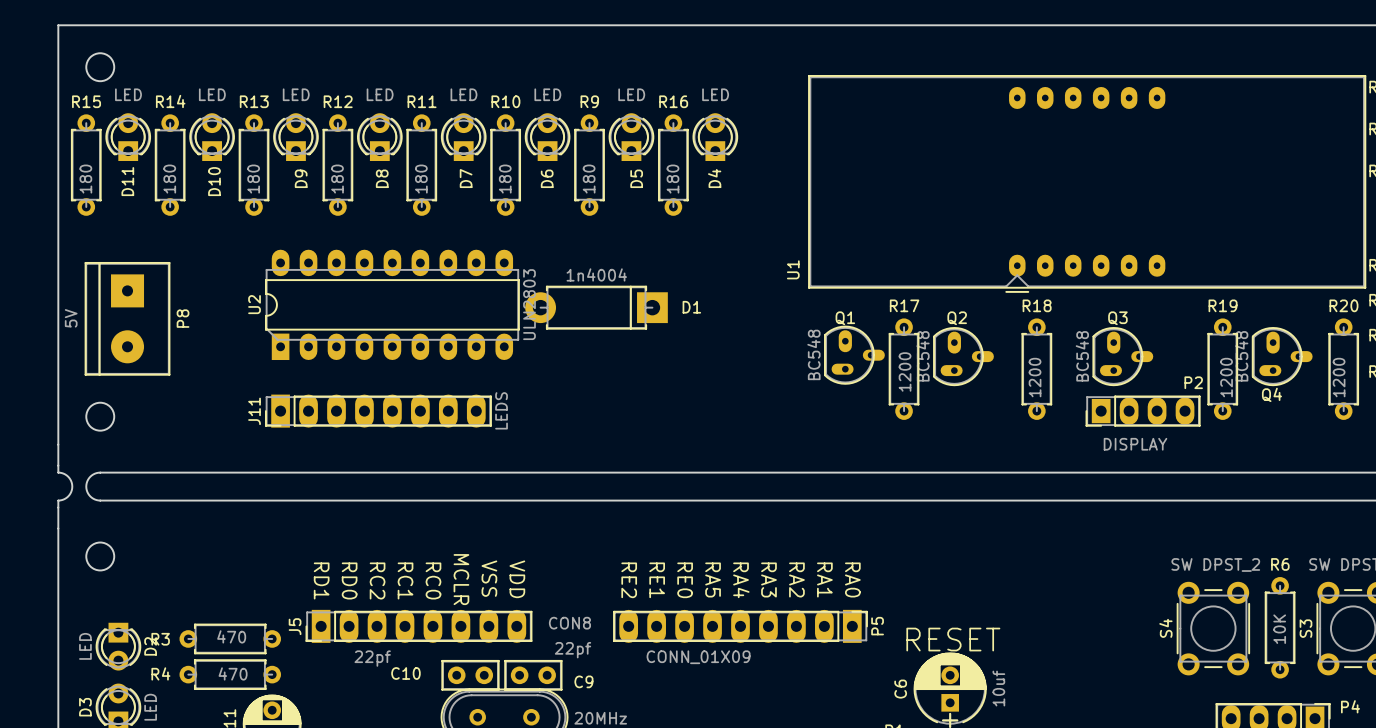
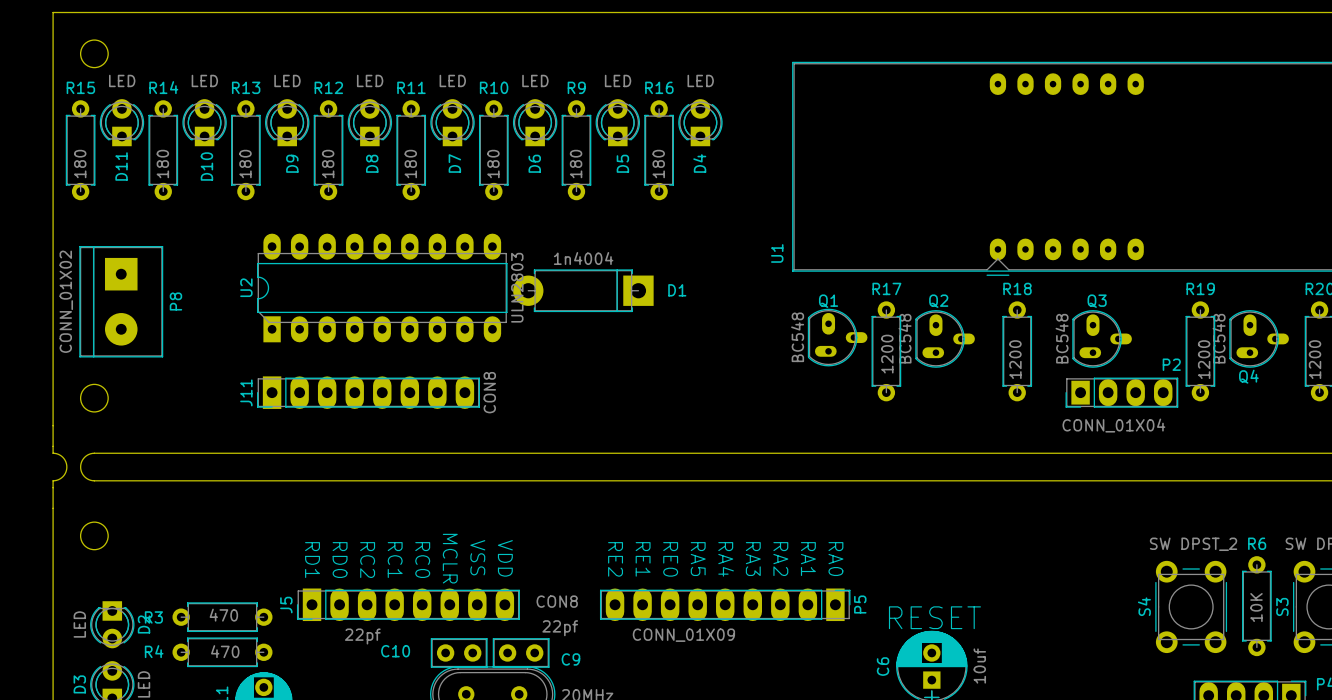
P8 value: 5V (71, 318) -> CONN_01X02 (66, 301)
J11 value: LEDS (501, 410) -> CON8 (489, 392)
P2 value: DISPLAY (1135, 444) -> CONN_01X04 (1113, 425)

